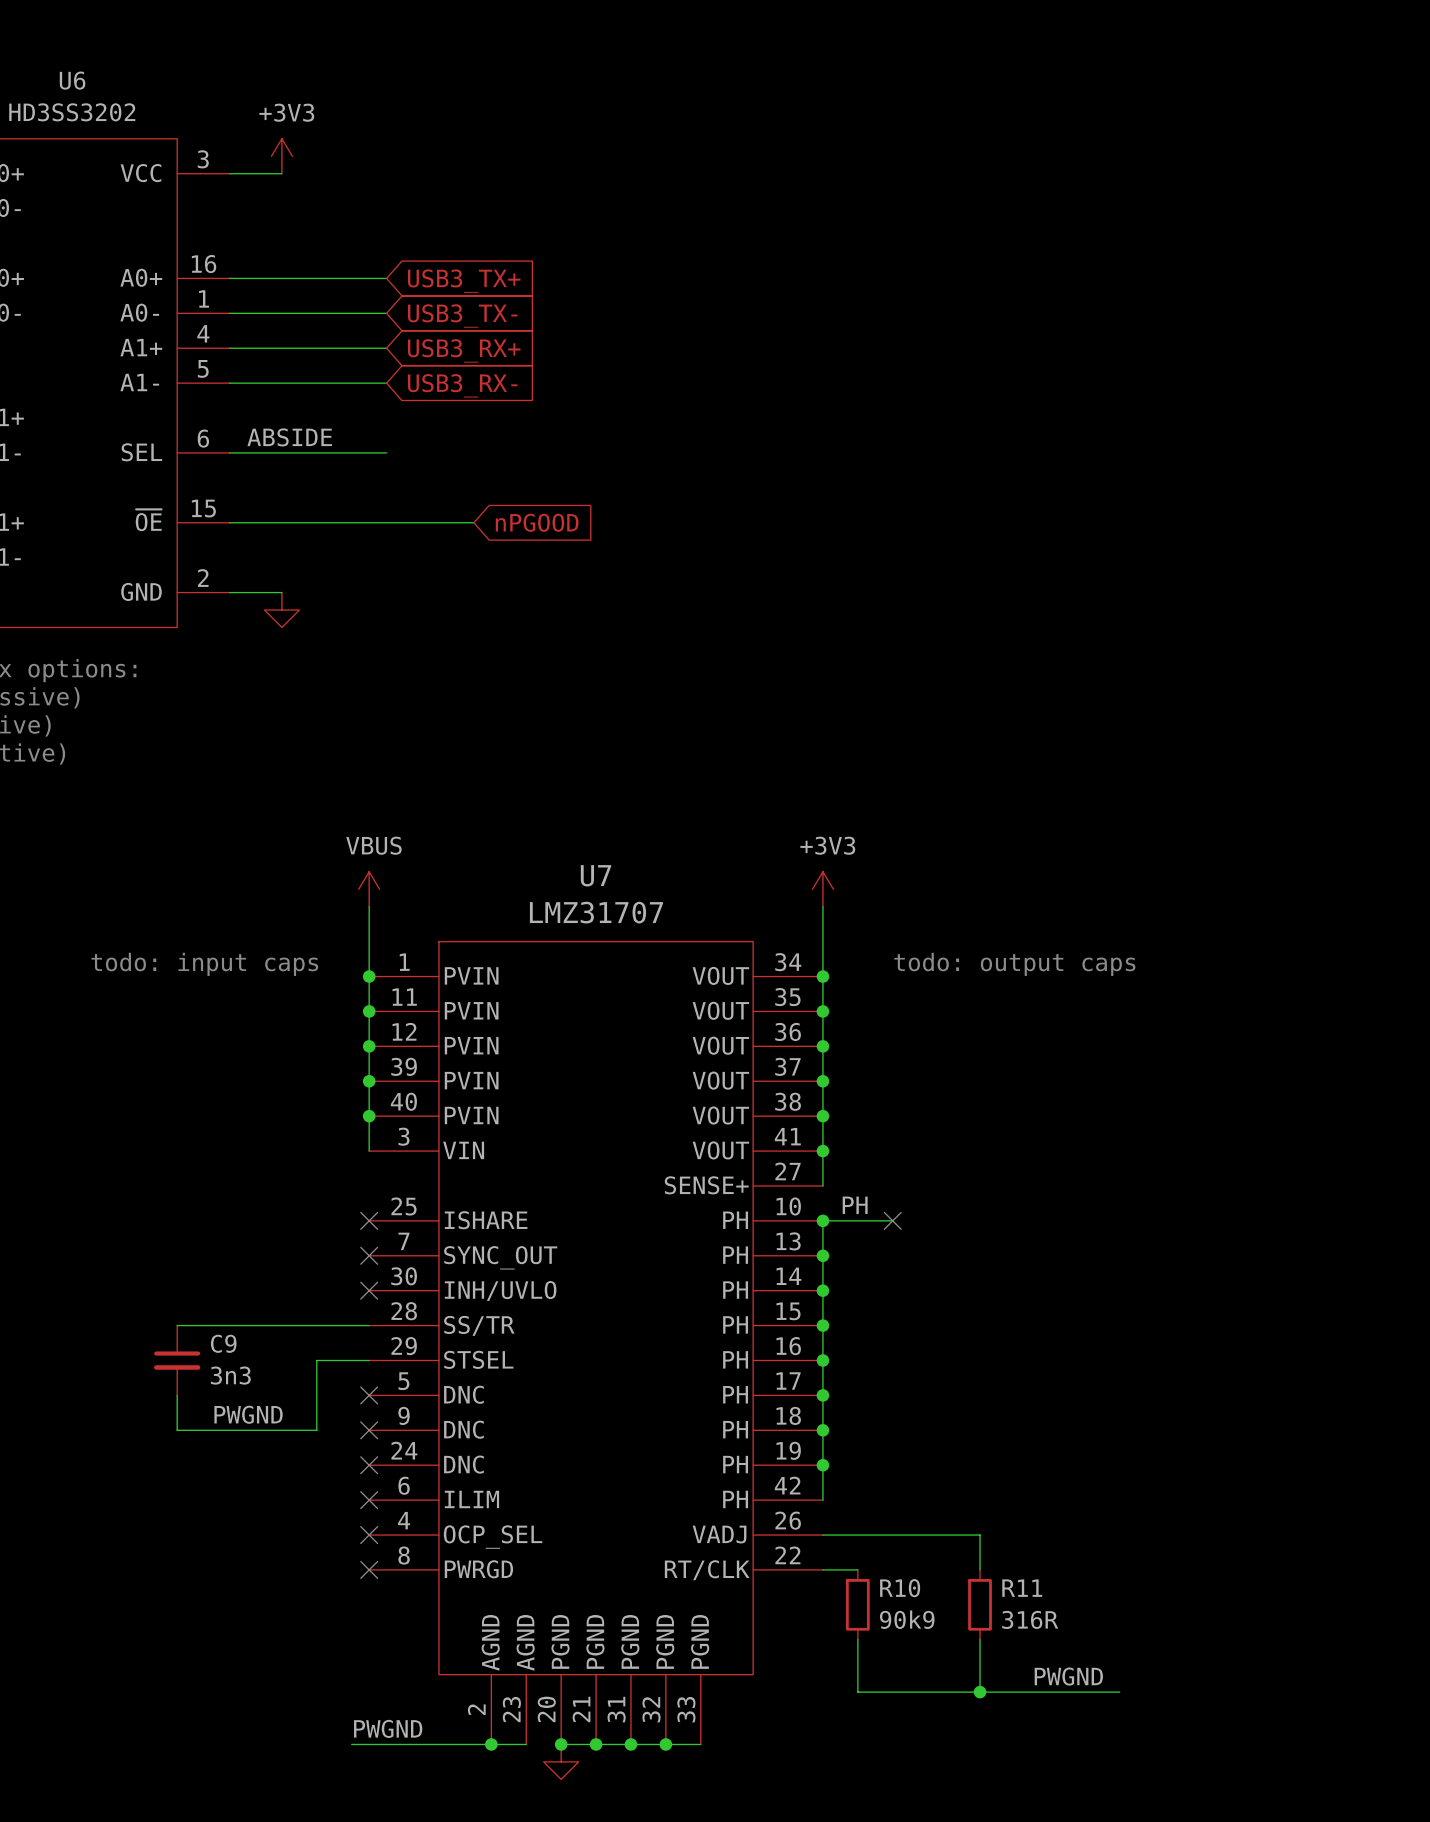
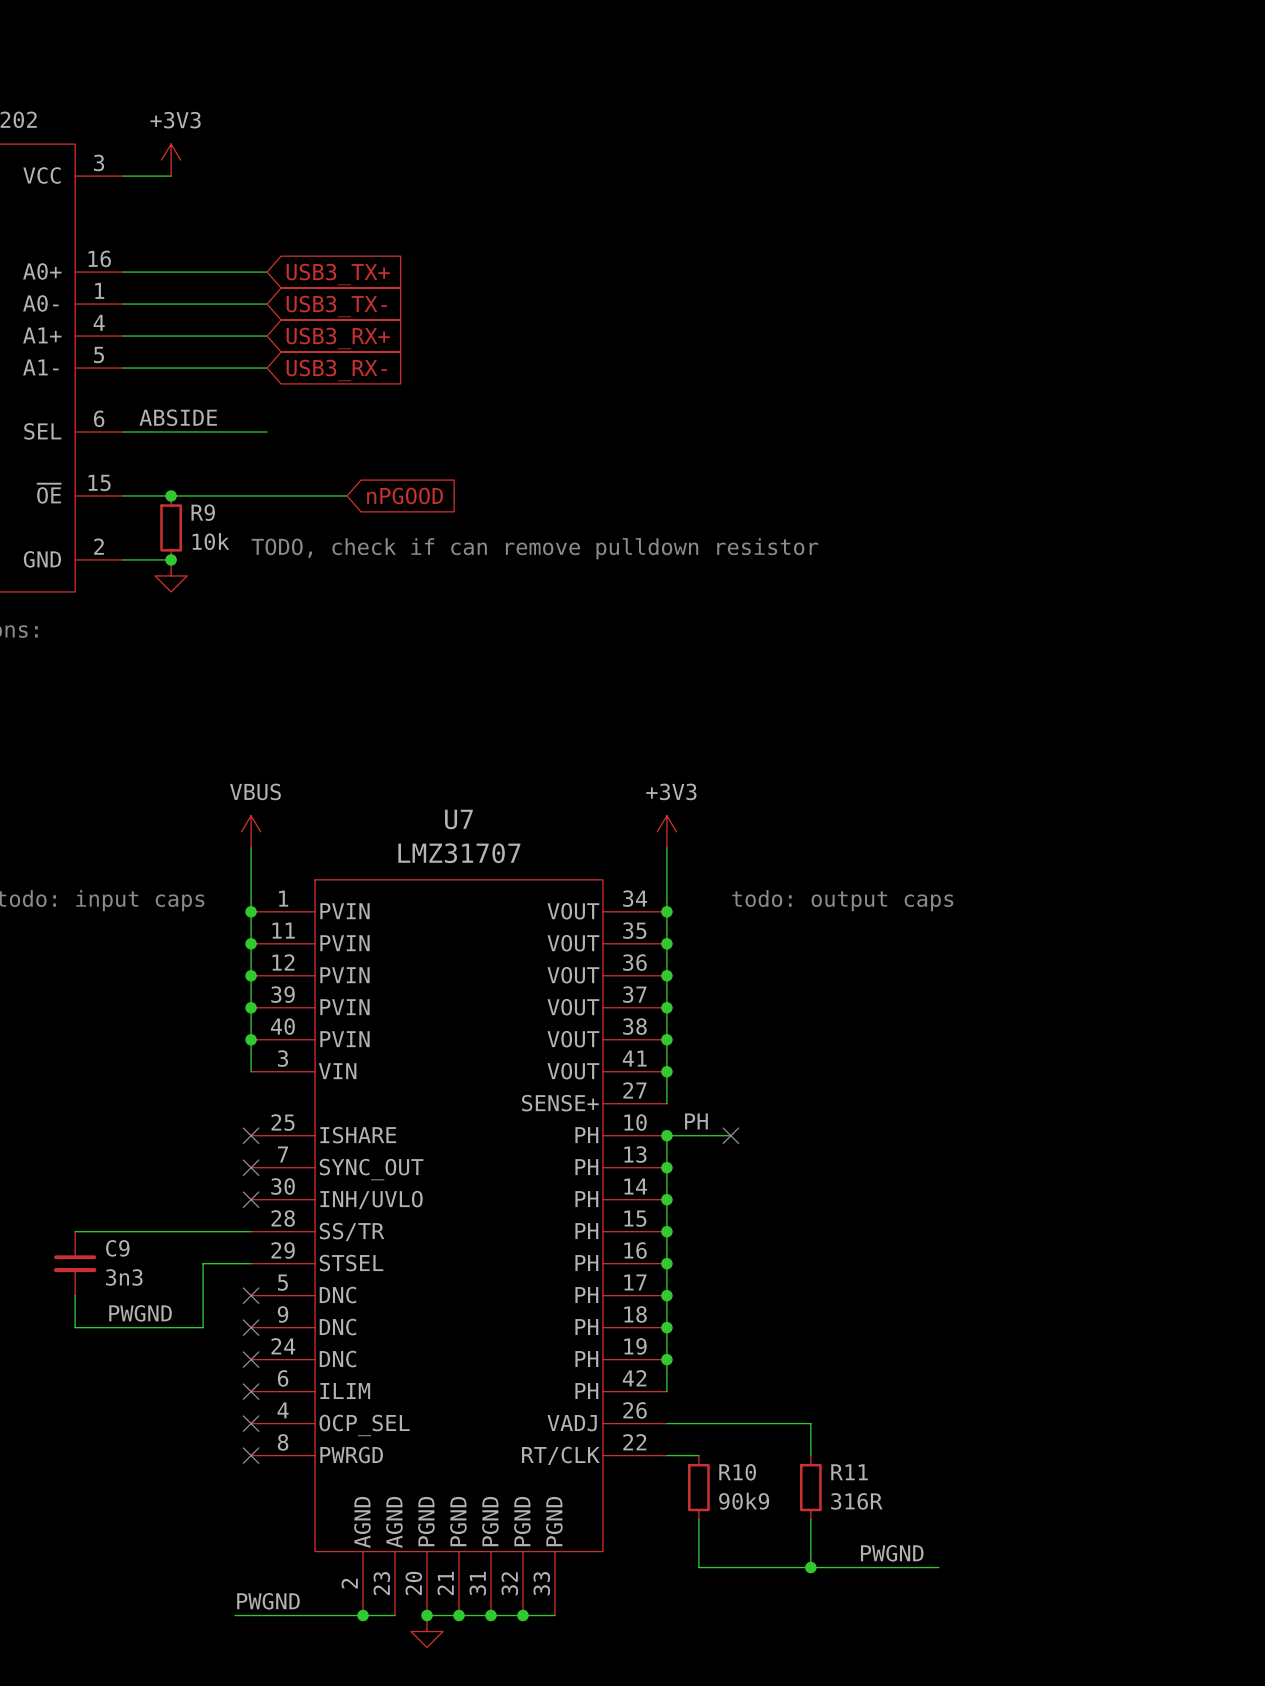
junction: none -> (171, 495)
R9: none -> 10k (171, 527)
text: none -> TODO, check if can remove pulldown resistor (534, 548)
junction: none -> (171, 559)

